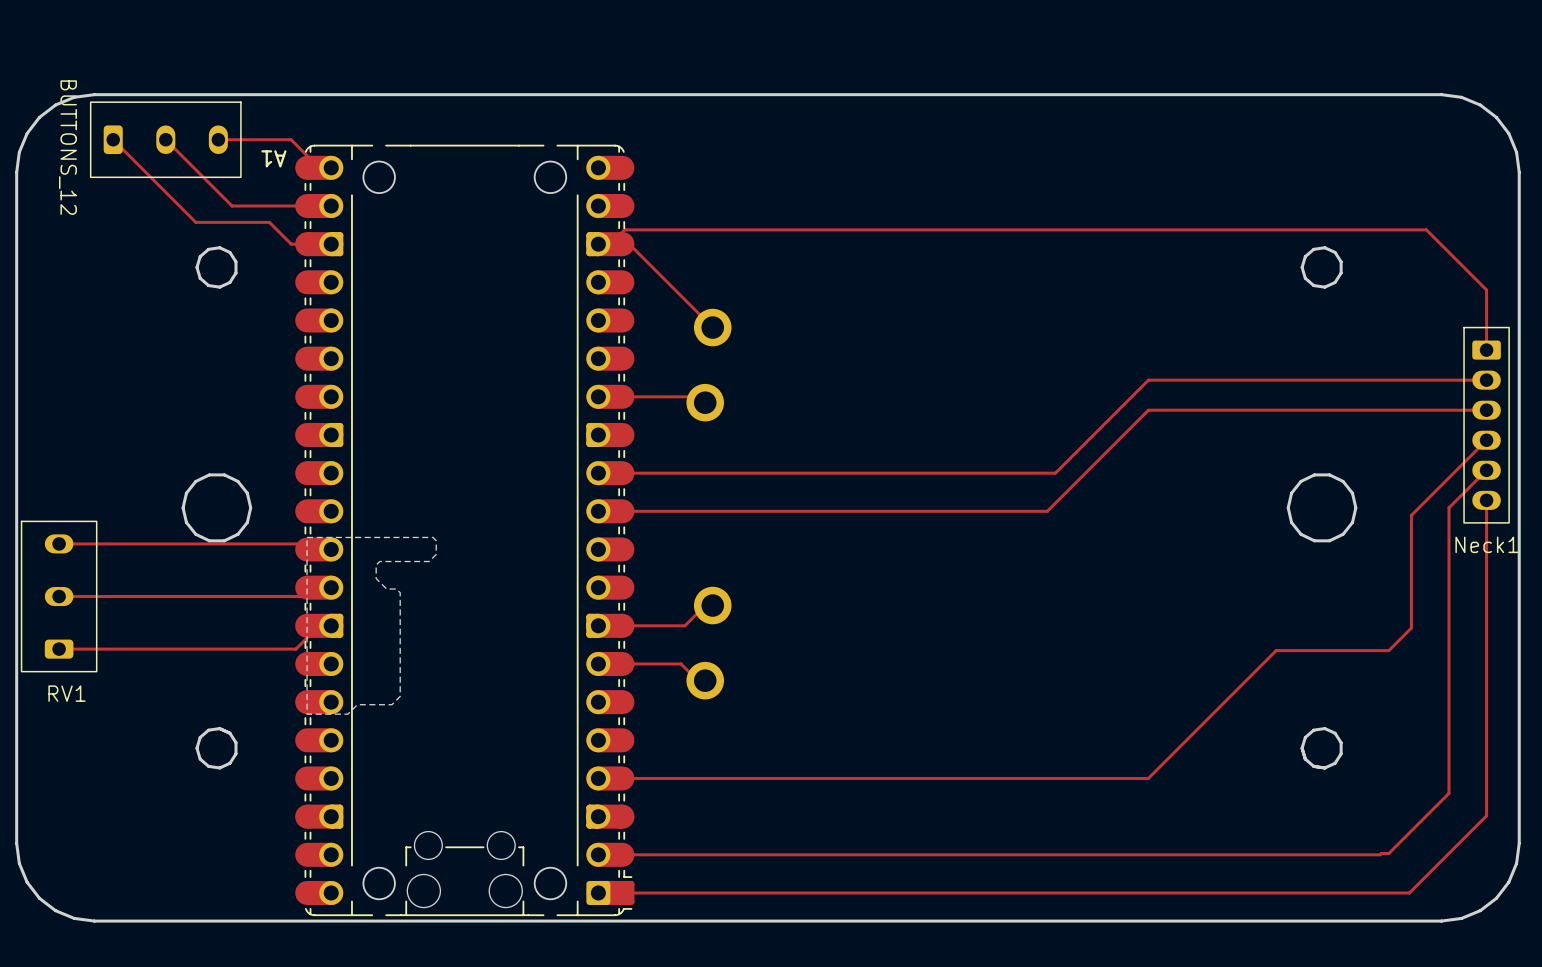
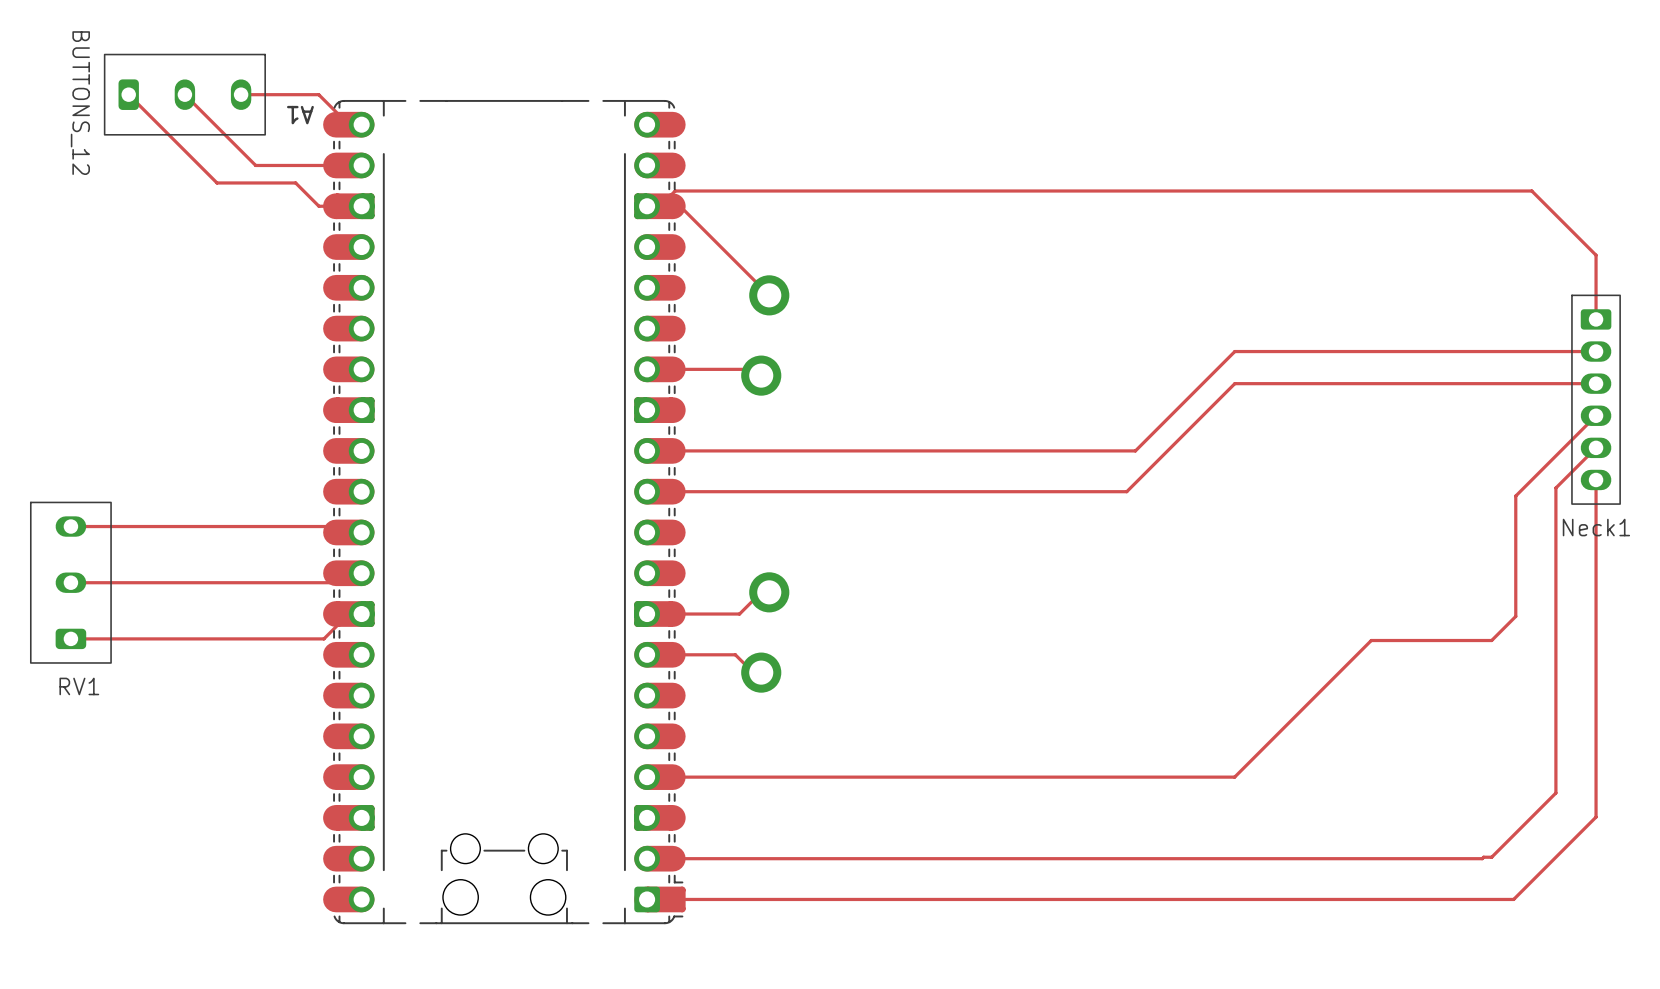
board edge: (94, 94) (1441, 94) (1461, 97) (1480, 105) (1496, 117) (1508, 133) (1516, 152) (1519, 172) (1519, 843) (1516, 863) (1508, 882) (1496, 898) (1480, 910) (1461, 918) (1441, 921) (94, 921) (74, 918) (55, 910) (39, 898) (27, 882) (19, 863) (16, 843) (16, 172) (19, 152) (27, 133) (39, 117) (55, 105) (74, 97) (94, 94) -> none
A1 footprint: [295, 144, 635, 917] -> [323, 99, 686, 925]
board edge: (219, 247) (208, 249) (200, 256) (196, 267) (200, 278) (208, 285) (219, 287) (229, 282) (235, 273) (235, 261) (229, 252) (219, 247) -> none
board edge: (1324, 247) (1313, 249) (1305, 256) (1302, 267) (1305, 278) (1313, 285) (1324, 287) (1335, 282) (1341, 273) (1341, 261) (1335, 252) (1324, 247) -> none
board edge: (209, 474) (195, 481) (186, 493) (183, 507) (186, 522) (195, 534) (209, 540) (224, 540) (237, 534) (247, 522) (250, 507) (247, 493) (237, 481) (224, 474) (209, 474) -> none
board edge: (1314, 474) (1329, 474) (1343, 481) (1352, 493) (1355, 507) (1352, 522) (1343, 534) (1329, 540) (1314, 540) (1300, 534) (1291, 522) (1288, 507) (1291, 493) (1300, 481) (1314, 474) -> none
board edge: (219, 728) (229, 733) (235, 742) (235, 753) (229, 763) (219, 767) (208, 766) (200, 759) (196, 748) (200, 737) (208, 730) (219, 728) -> none
board edge: (1324, 728) (1313, 730) (1305, 737) (1302, 748) (1305, 759) (1313, 766) (1324, 767) (1335, 763) (1341, 753) (1341, 742) (1335, 733) (1324, 728) -> none

